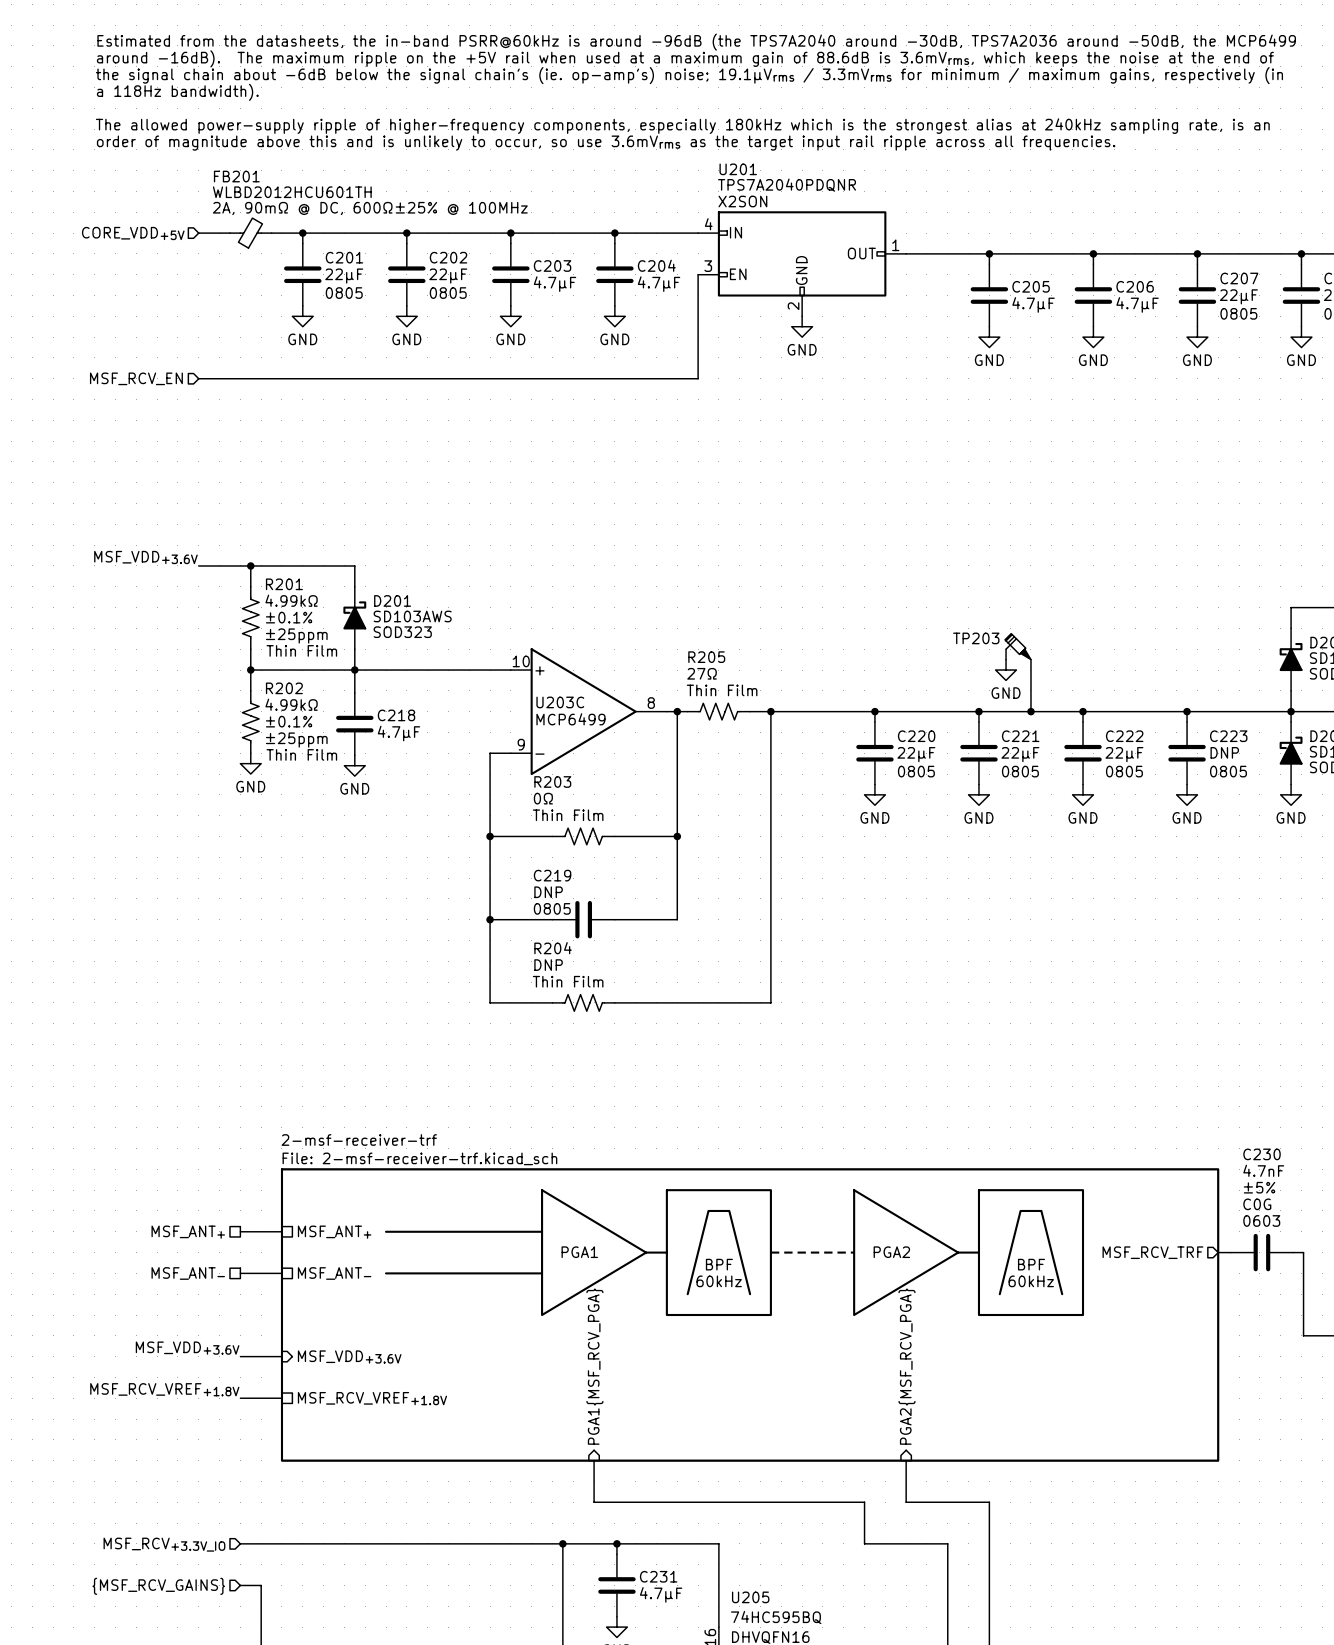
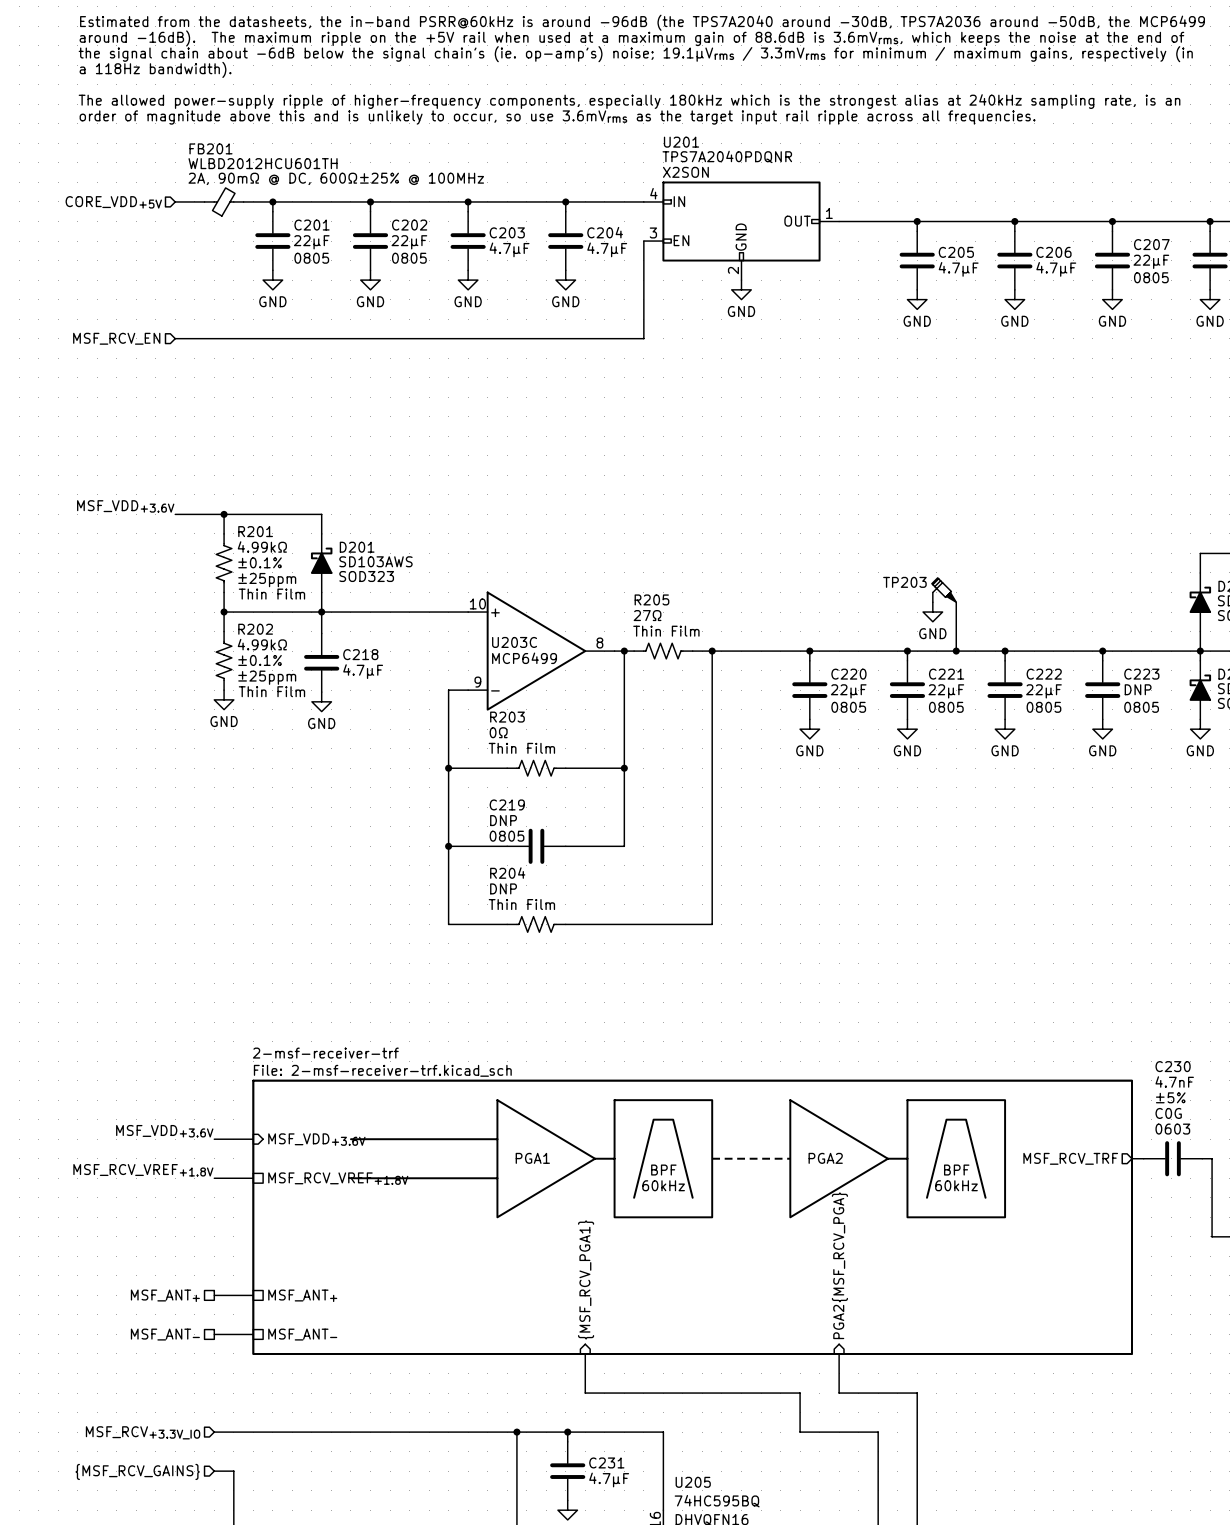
hierarchical label position: MSF_ANT+ (188, 1232) -> MSF_ANT+ (165, 1295)
sheet pin shape: passive (334, 1232) -> input (316, 1139)
sheet pin: MSF_ANT+ (334, 1232) -> MSF_VDD+3.6V (316, 1139)
hierarchical label position: MSF_ANT- (188, 1273) -> MSF_ANT- (165, 1334)
sheet pin: MSF_ANT- (334, 1273) -> MSF_RCV_VREF+1.8V (338, 1178)
label position: MSF_VDD+3.6V (187, 1348) -> MSF_VDD+3.6V (164, 1131)
wire: (240, 1356) (281, 1356) -> (214, 1334) (253, 1334)
sheet pin: MSF_VDD+3.6V (349, 1357) -> none
sheet pin: PGA1{MSF_RCV_PGA} (594, 1366) -> none
sheet pin: none -> {MSF_RCV_PGA1} (586, 1279)
label position: MSF_RCV_VREF+1.8V (164, 1389) -> MSF_RCV_VREF+1.8V (143, 1170)
sheet pin: MSF_RCV_VREF+1.8V (372, 1398) -> MSF_ANT+ (302, 1295)
sheet pin: none -> MSF_ANT- (302, 1334)
bus: (594, 1460) (594, 1502) (635, 1502) -> (585, 1353) (585, 1393)

